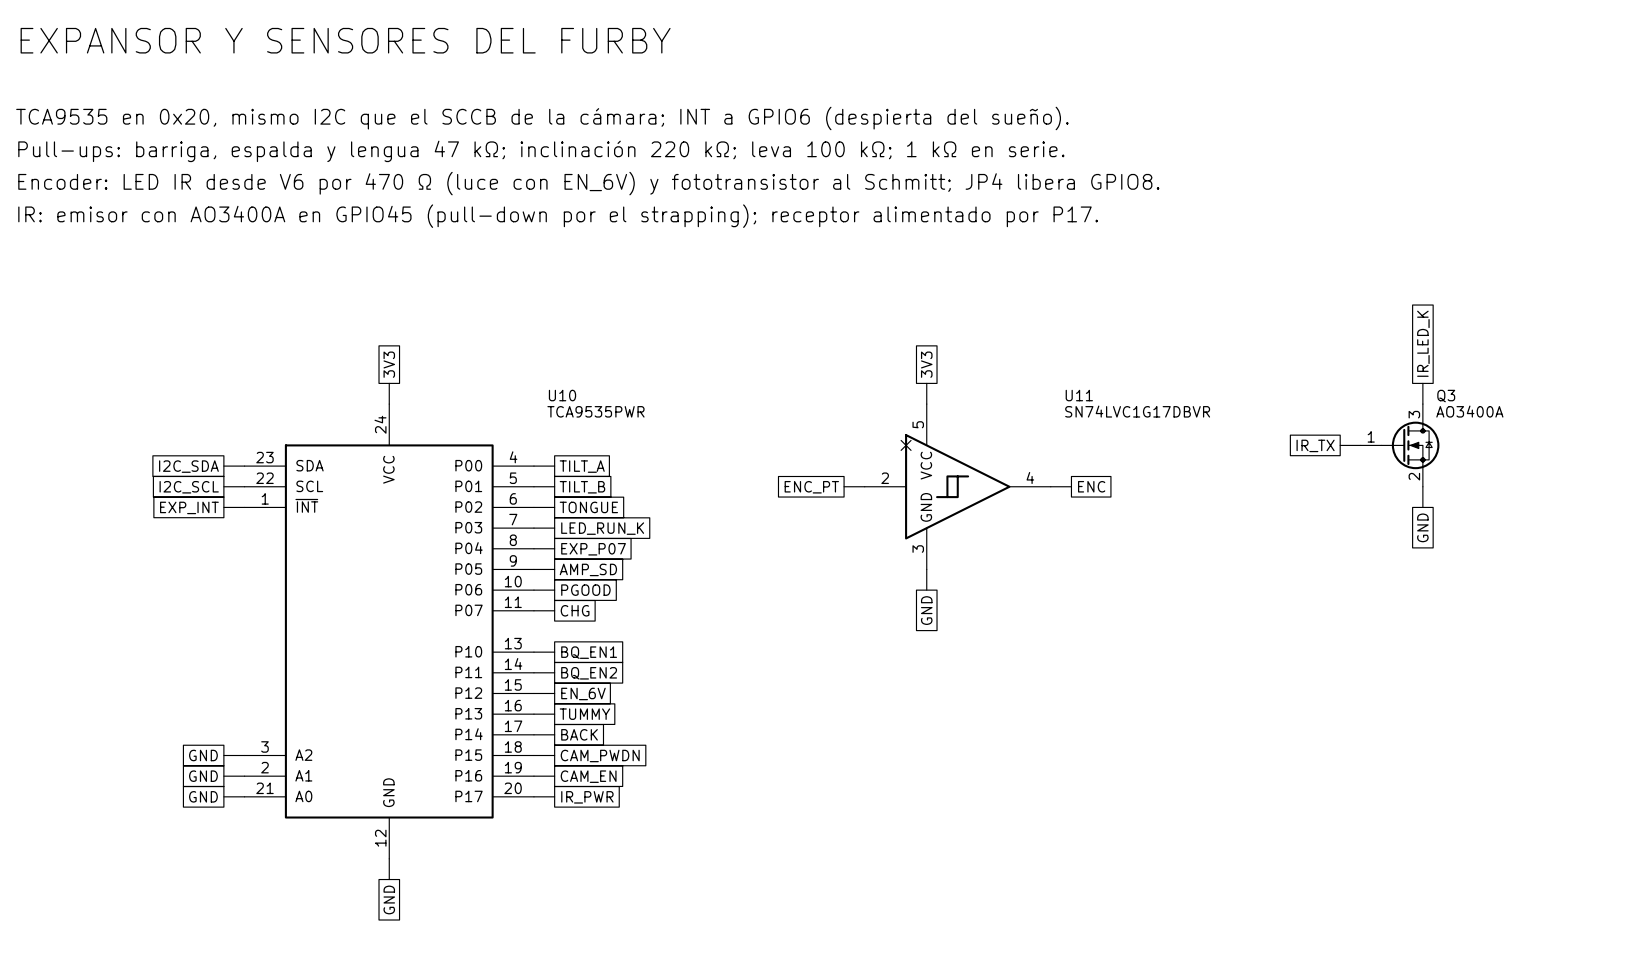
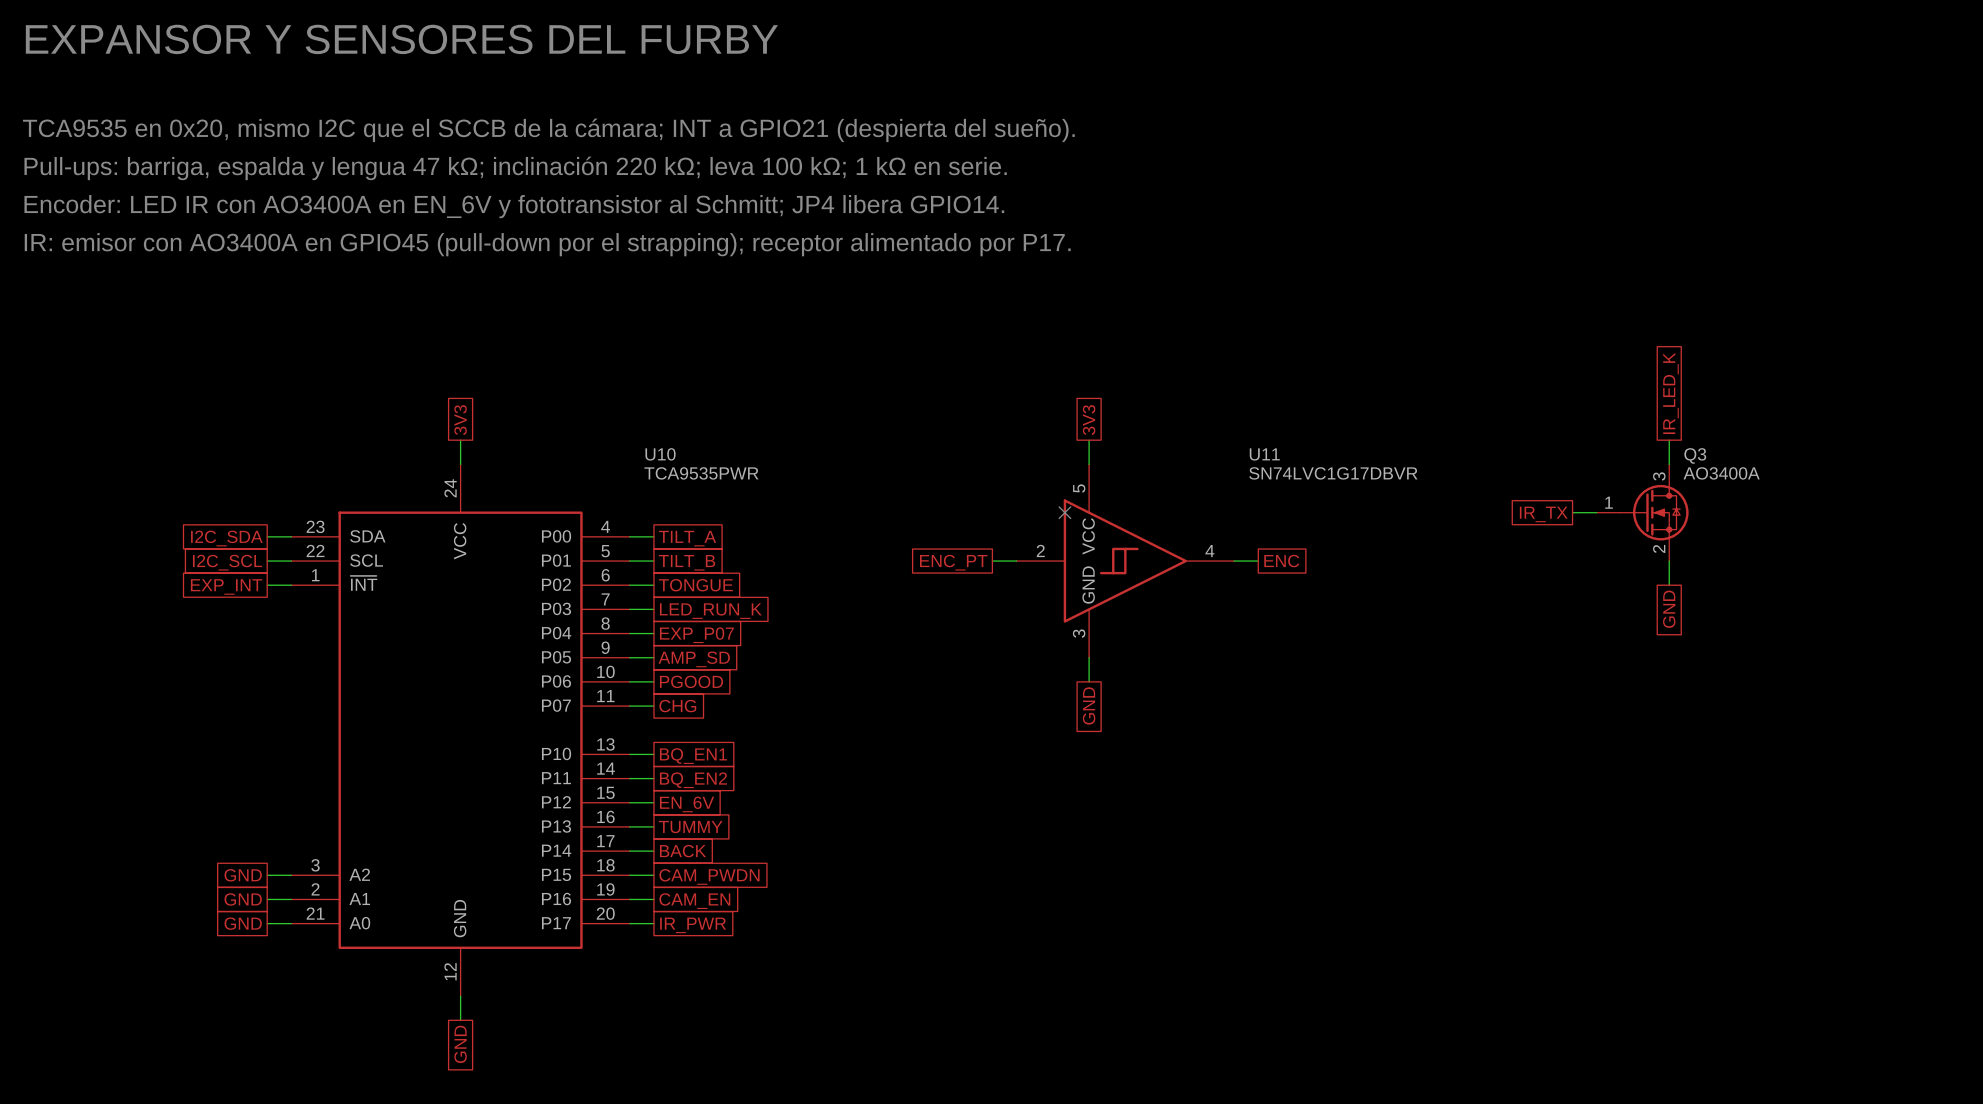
text: TCA9535 en 0x20, mismo I2C que el SCCB de la cámara; INT a GPIO6 (despierta del sueño). (542, 118) -> TCA9535 en 0x20, mismo I2C que el SCCB de la cámara; INT a GPIO21 (despierta del sueño). (548, 130)
text: Encoder: LED IR desde V6 por 470 Ω (luce con EN_6V) y fototransistor al Schmitt; JP4 libera GPIO8. (588, 183) -> Encoder: LED IR con AO3400A en EN_6V y fototransistor al Schmitt; JP4 libera GPIO14. (514, 206)

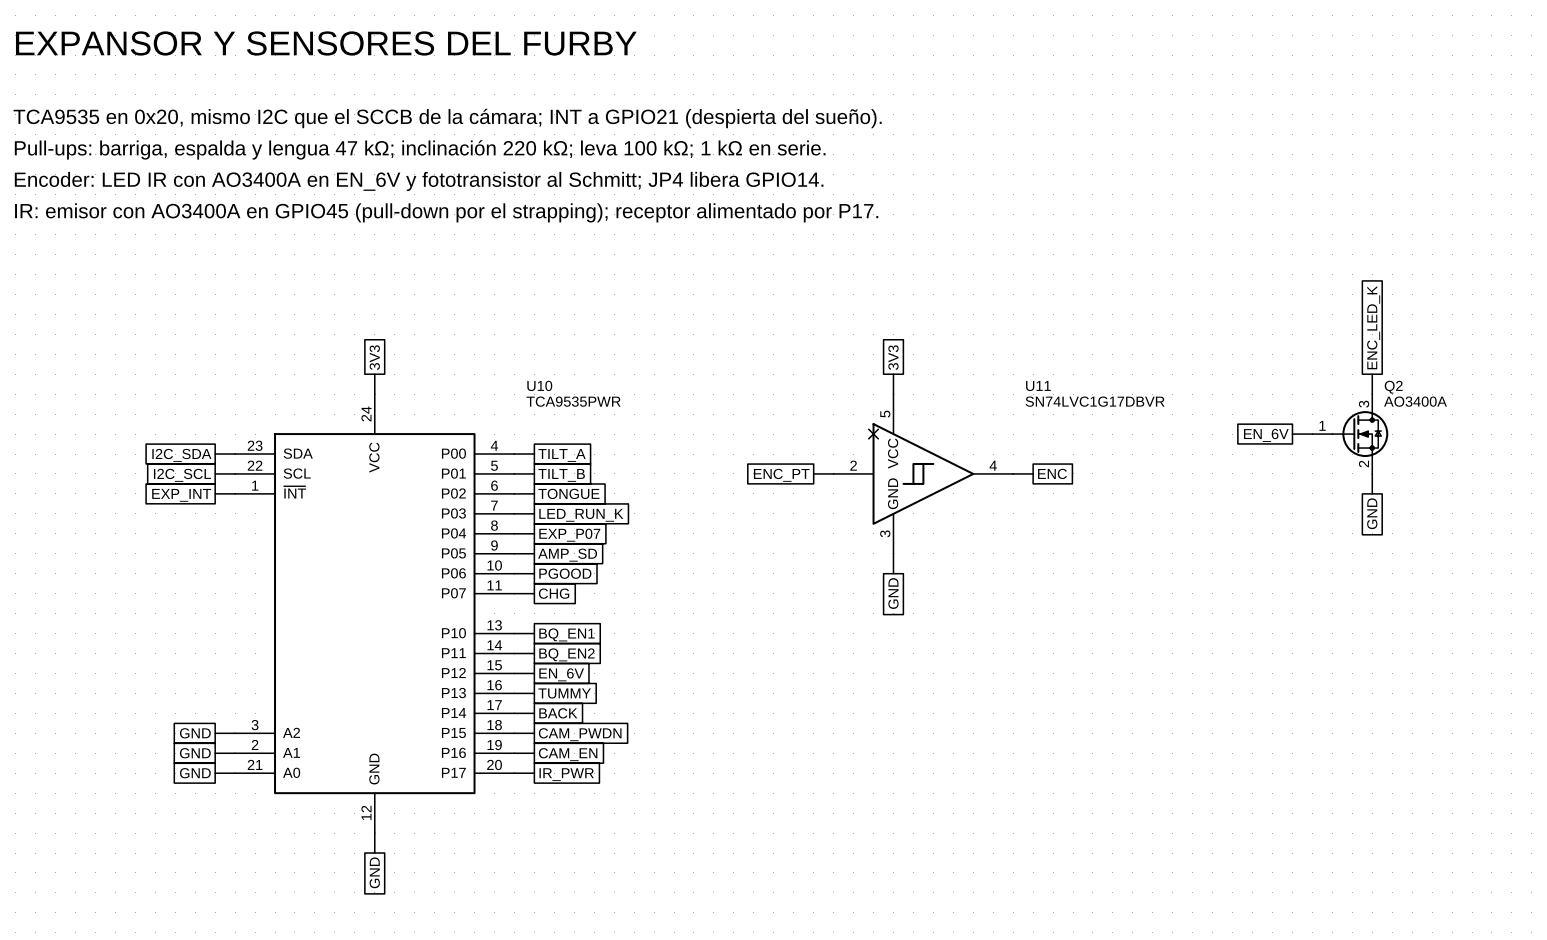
global label: IR_LED_K (1670, 393) -> ENC_LED_K (1373, 327)
Q3 name: Q3 (1695, 455) -> Q2 (1393, 387)
global label: IR_TX (1543, 514) -> EN_6V (1266, 435)

